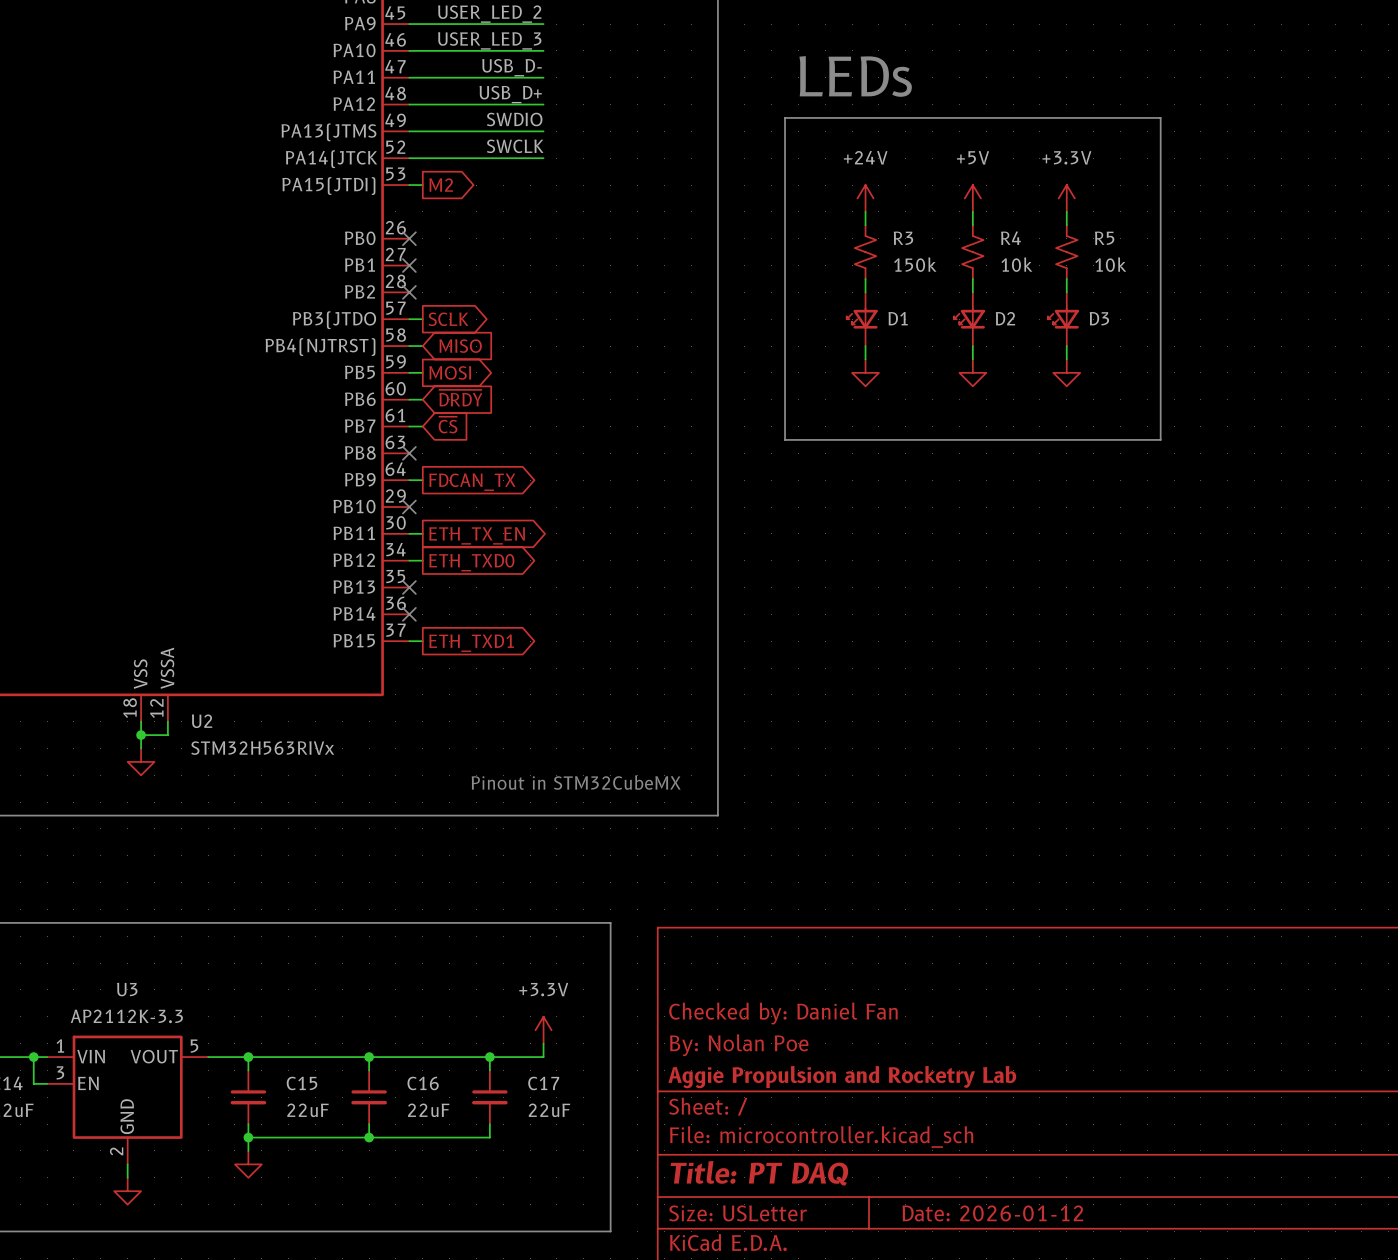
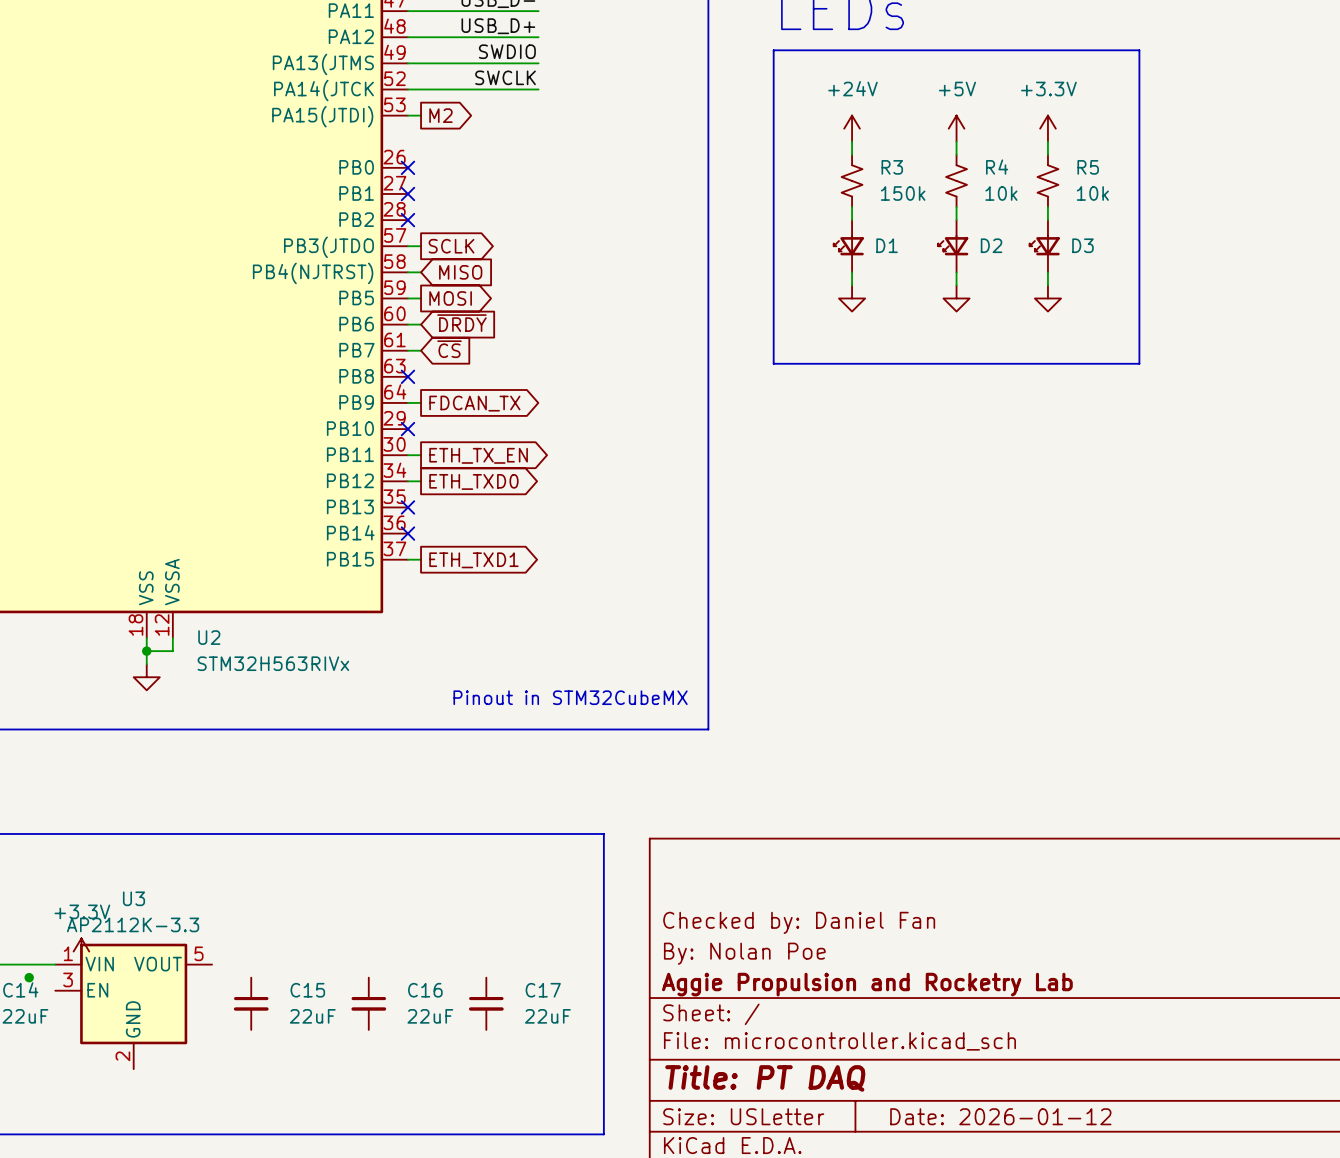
power symbol: +3.3V (543, 1030) -> none
power symbol: none -> +3.3V (81, 951)
wire: (543, 1043) (543, 1057) (208, 1057) -> none
wire: (33, 1057) (33, 1083) (47, 1083) -> none
junction position: (33, 1057) -> (29, 977)
wire: (248, 1057) (248, 1070) -> none
junction: (248, 1057) -> none
wire: (369, 1057) (369, 1070) -> none
junction: (369, 1057) -> none
wire: (489, 1057) (489, 1070) -> none
junction: (489, 1057) -> none
wire: (248, 1124) (248, 1150) -> none
wire: (369, 1124) (369, 1137) -> none
wire: (489, 1124) (489, 1137) (248, 1137) -> none
junction: (248, 1137) -> none
junction: (369, 1137) -> none
wire: (127, 1164) (127, 1177) -> none
power symbol: (248, 1164) -> none
power symbol: (127, 1191) -> none

